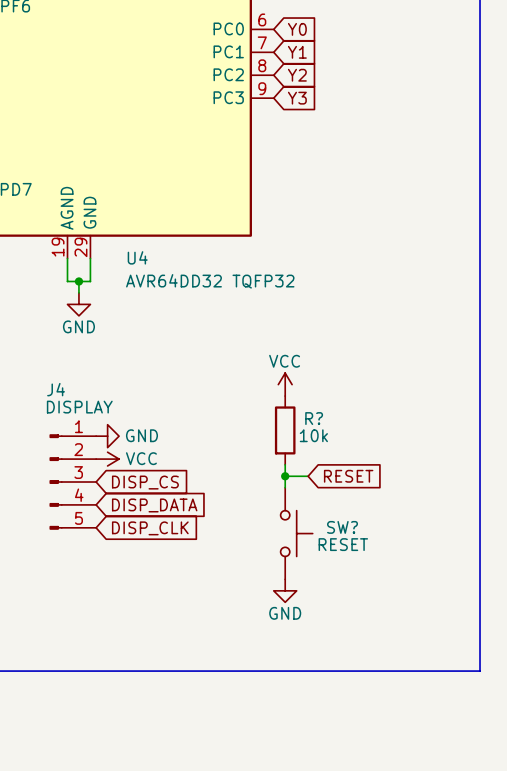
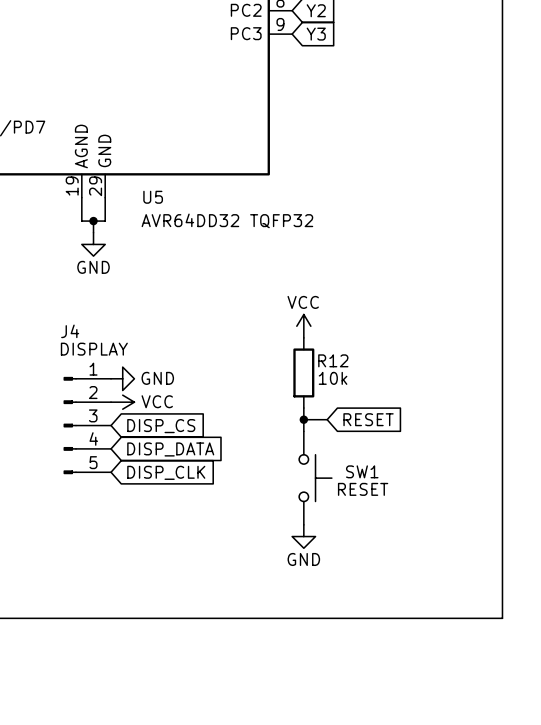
U4 name: U4 (137, 257) -> U5 (153, 197)
R? name: R? (314, 418) -> R12 (333, 360)
SW? name: SW? (342, 527) -> SW1 (362, 471)

